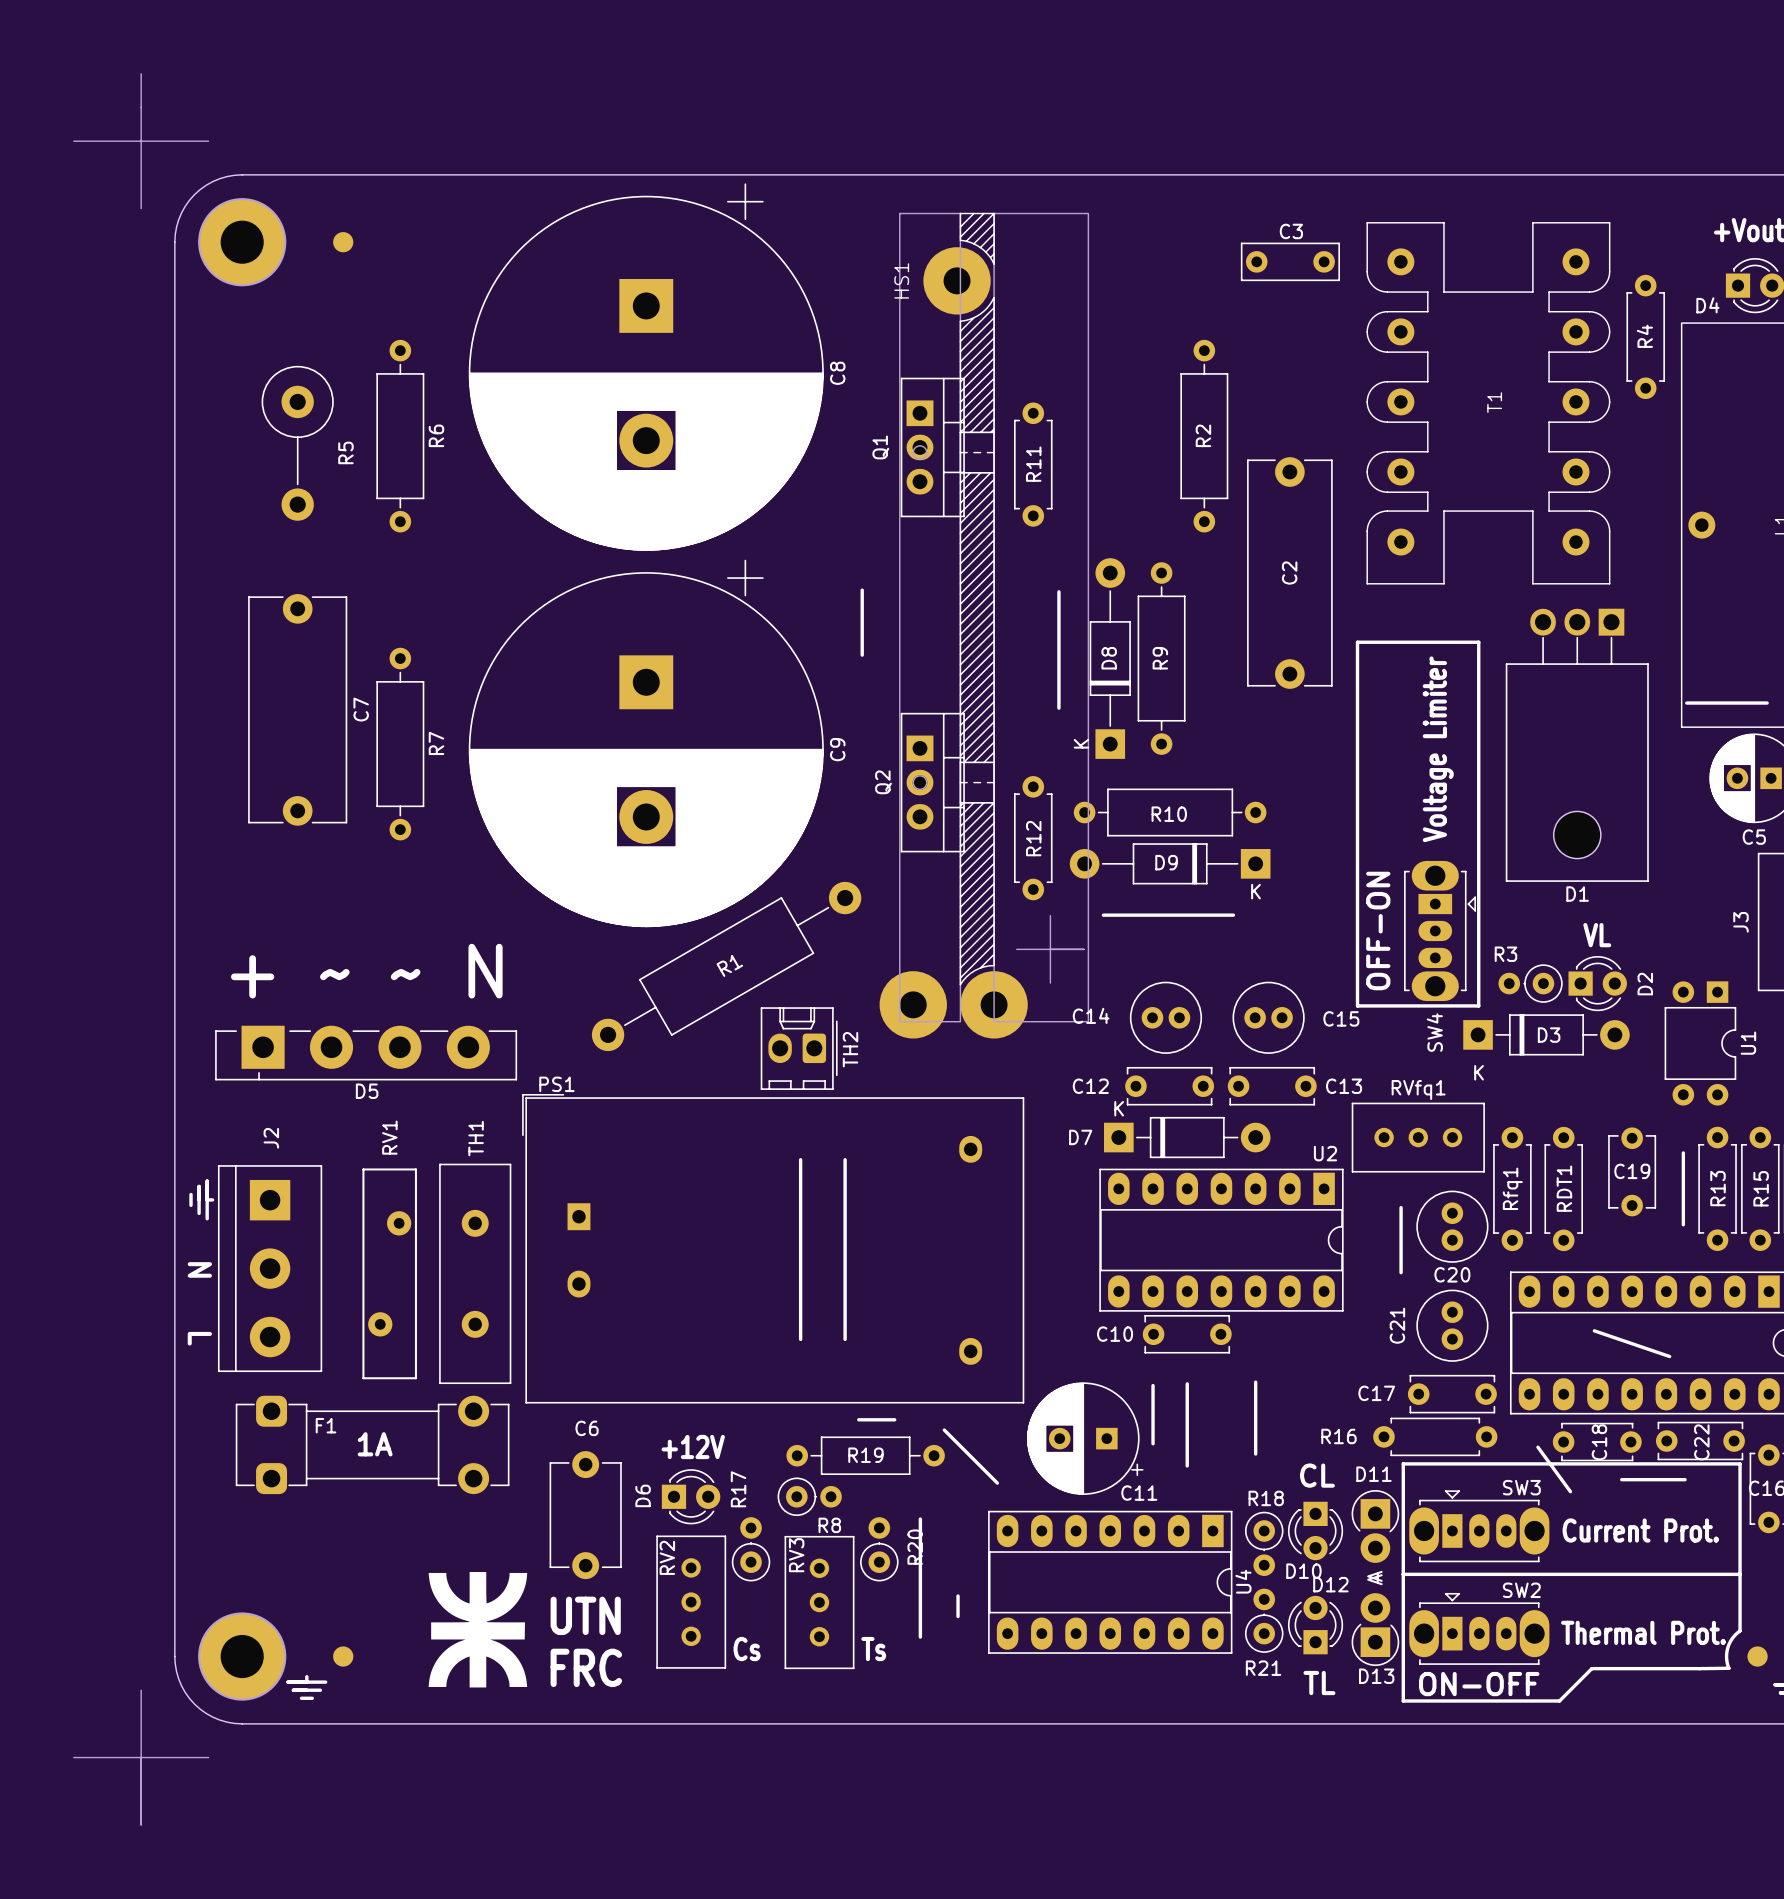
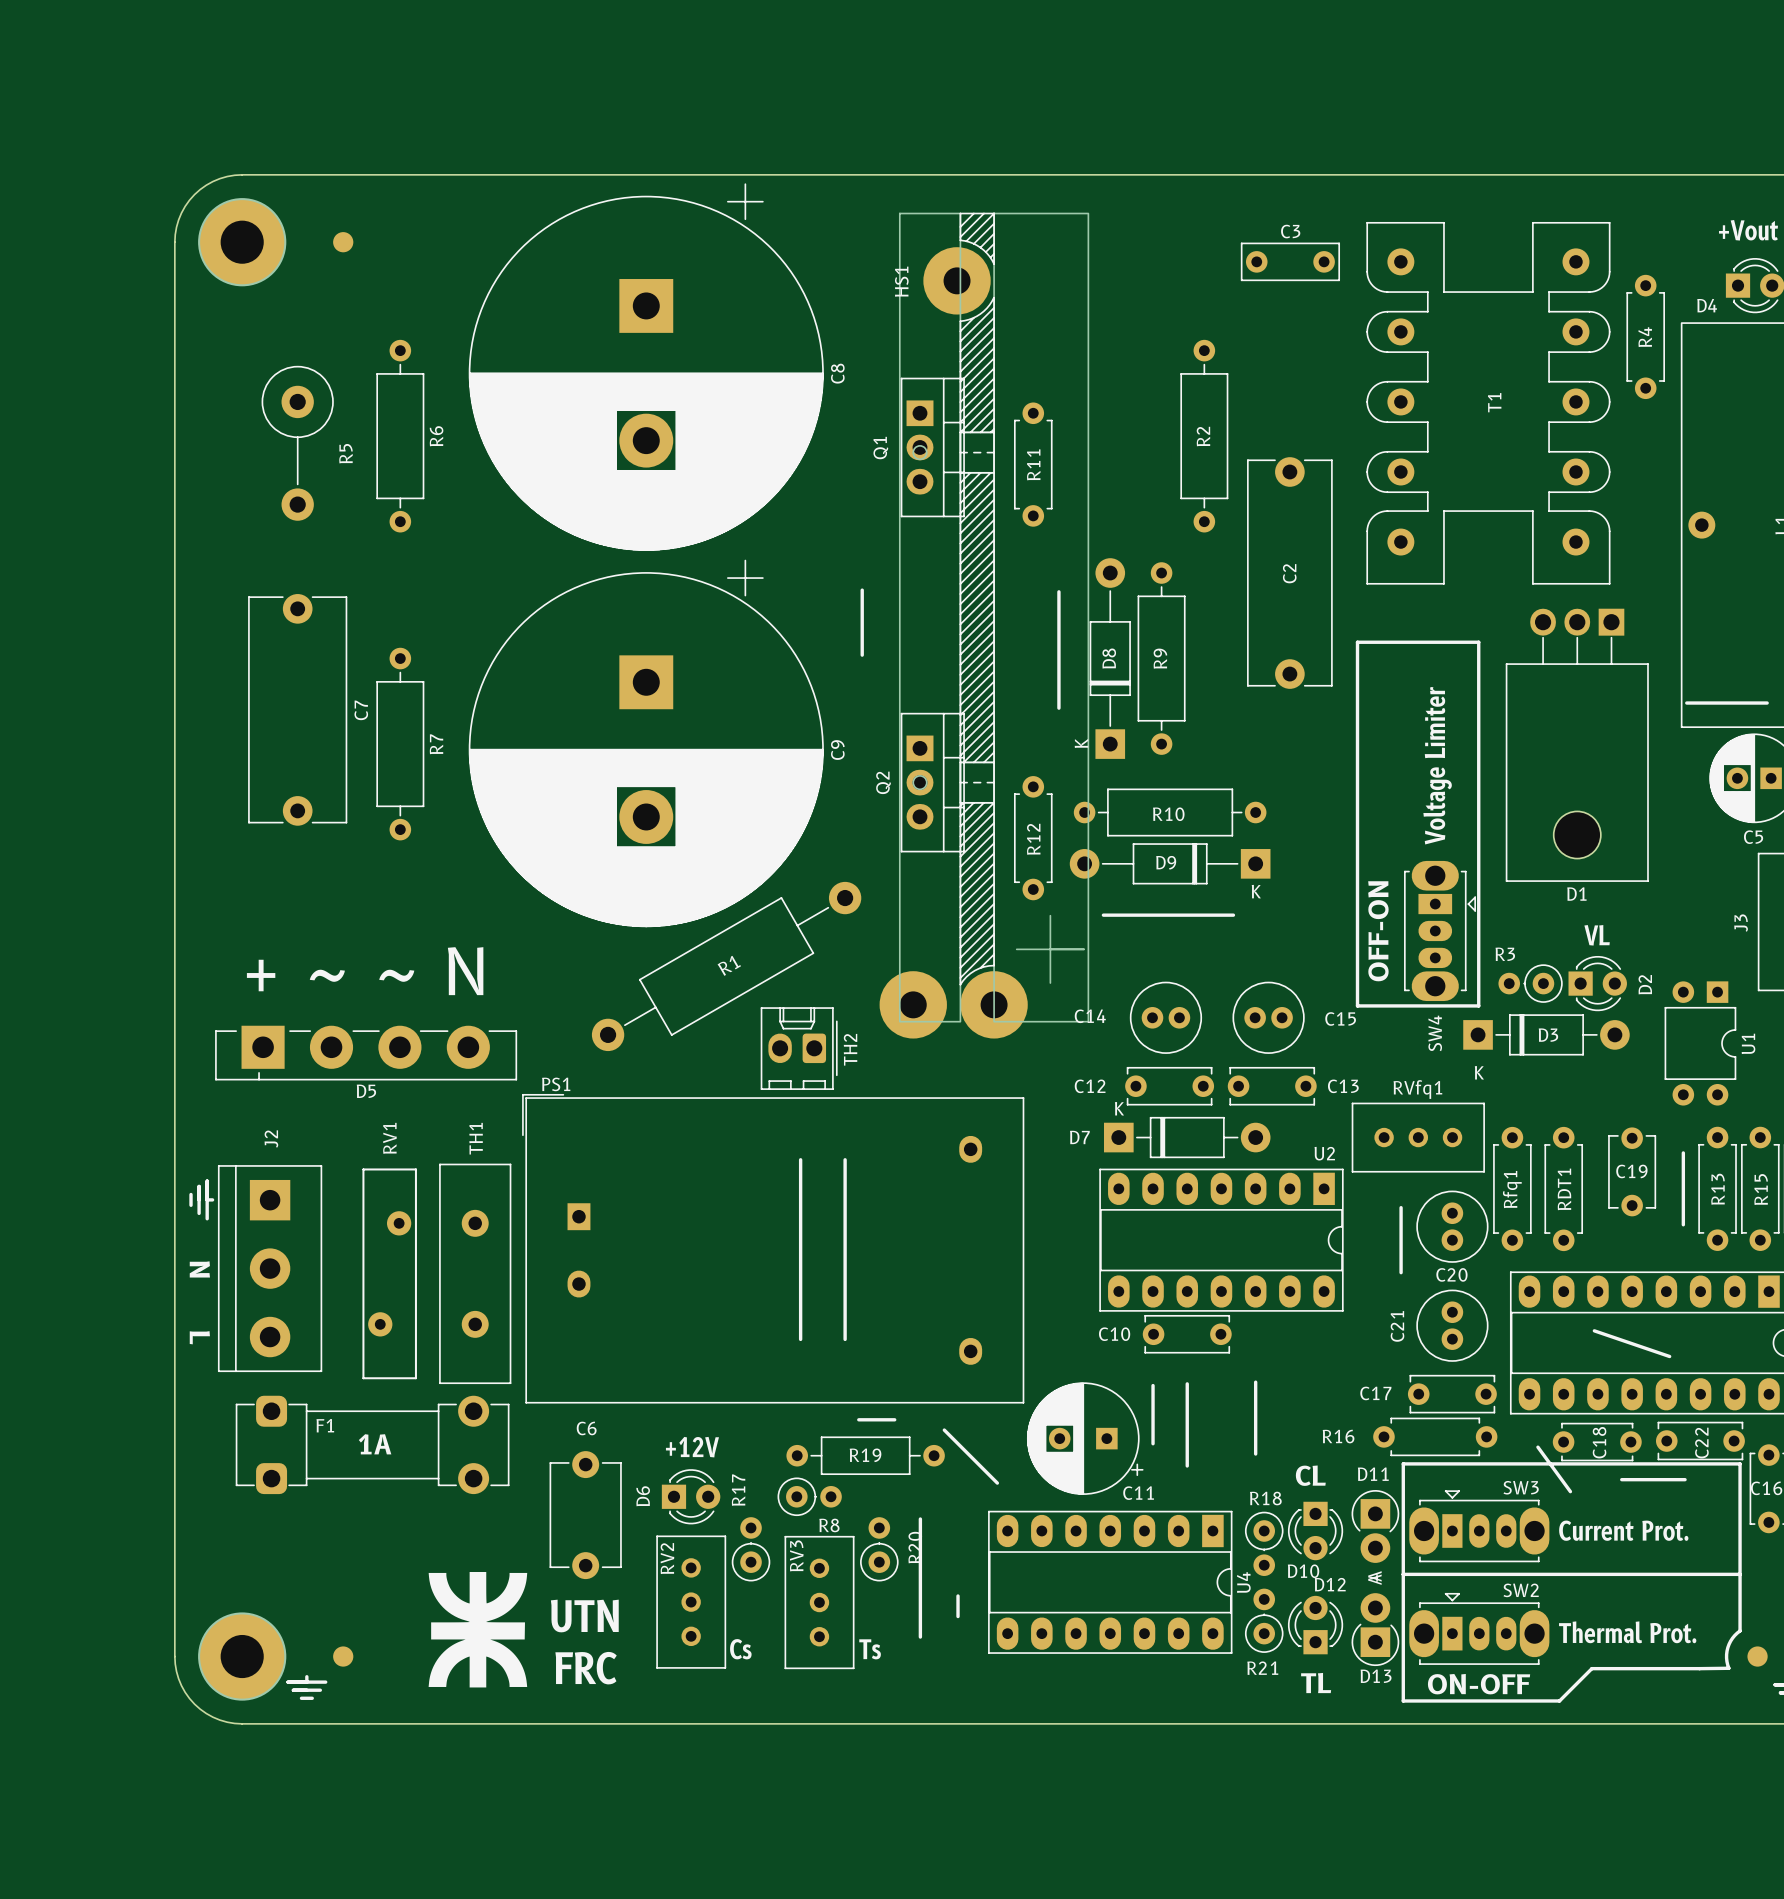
line: (141, 73) (141, 208) -> none
line: (73, 141) (208, 141) -> none
line: (141, 1690) (141, 1824) -> none
line: (73, 1757) (208, 1757) -> none

